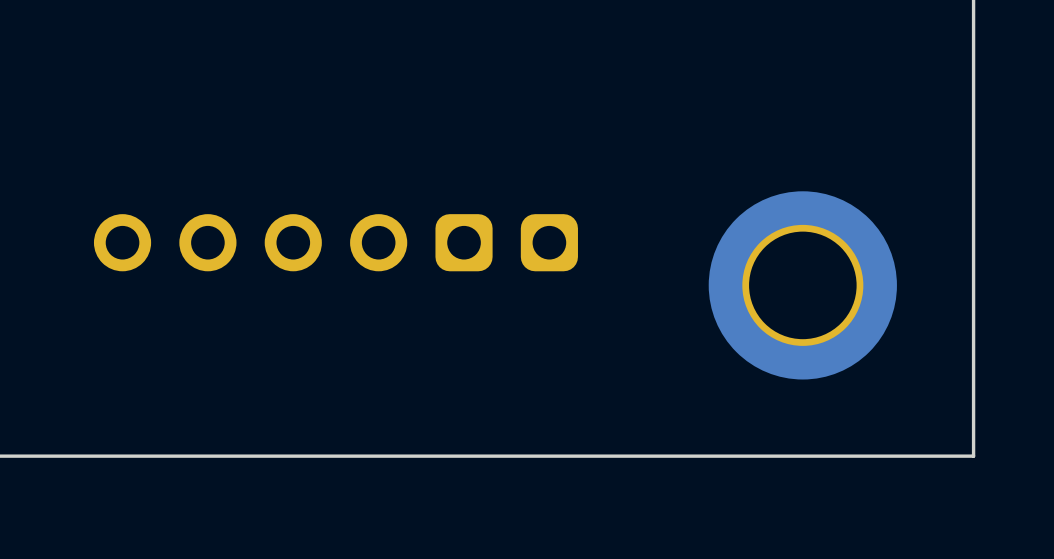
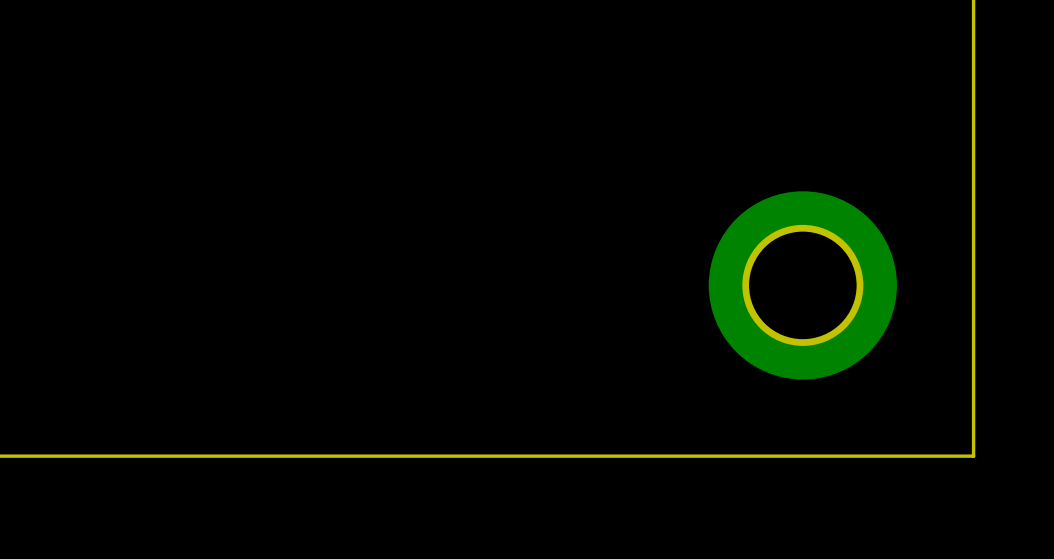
part: (335, 242) -> none

